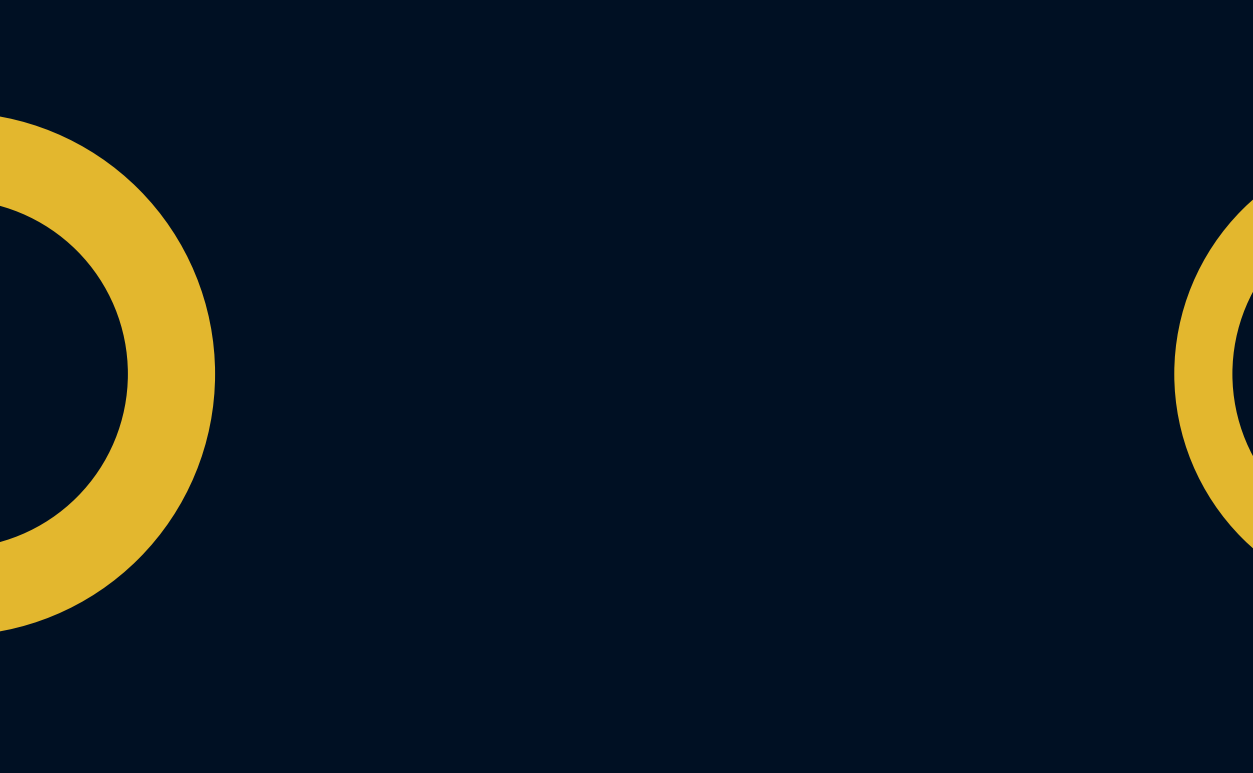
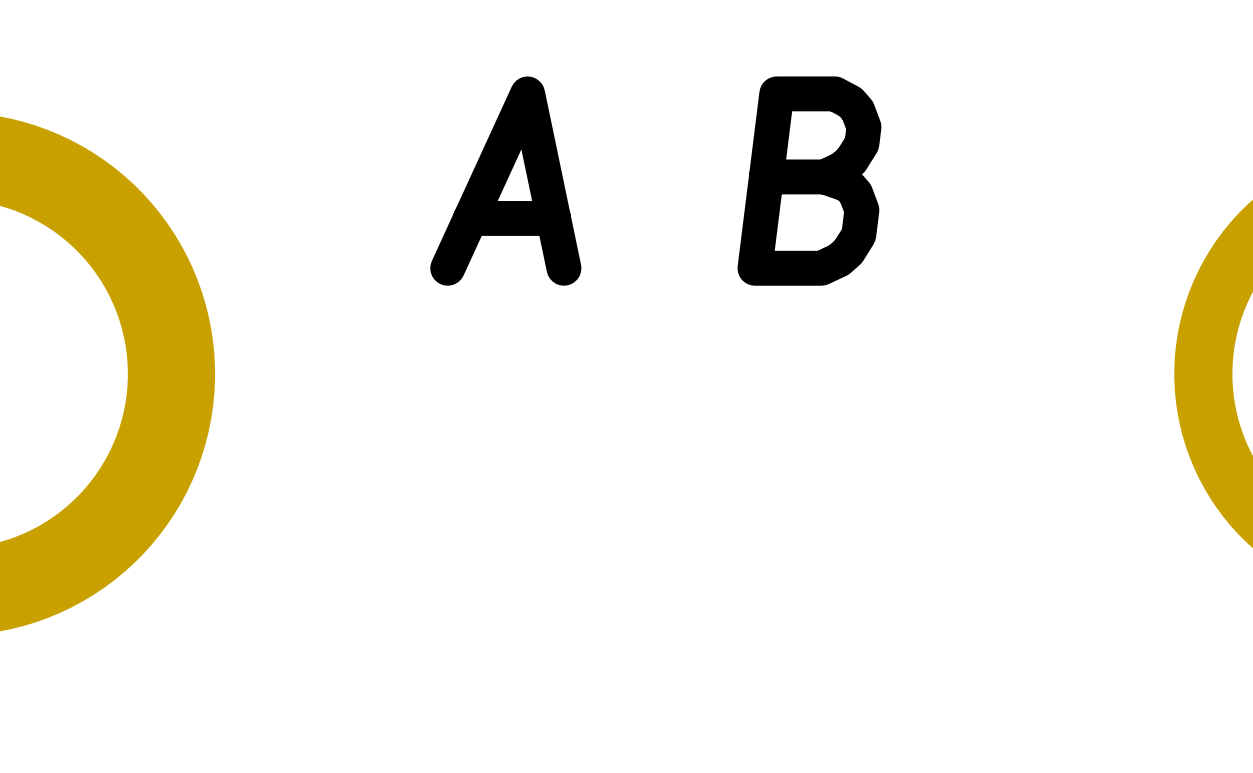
text: none -> A B (655, 181)

